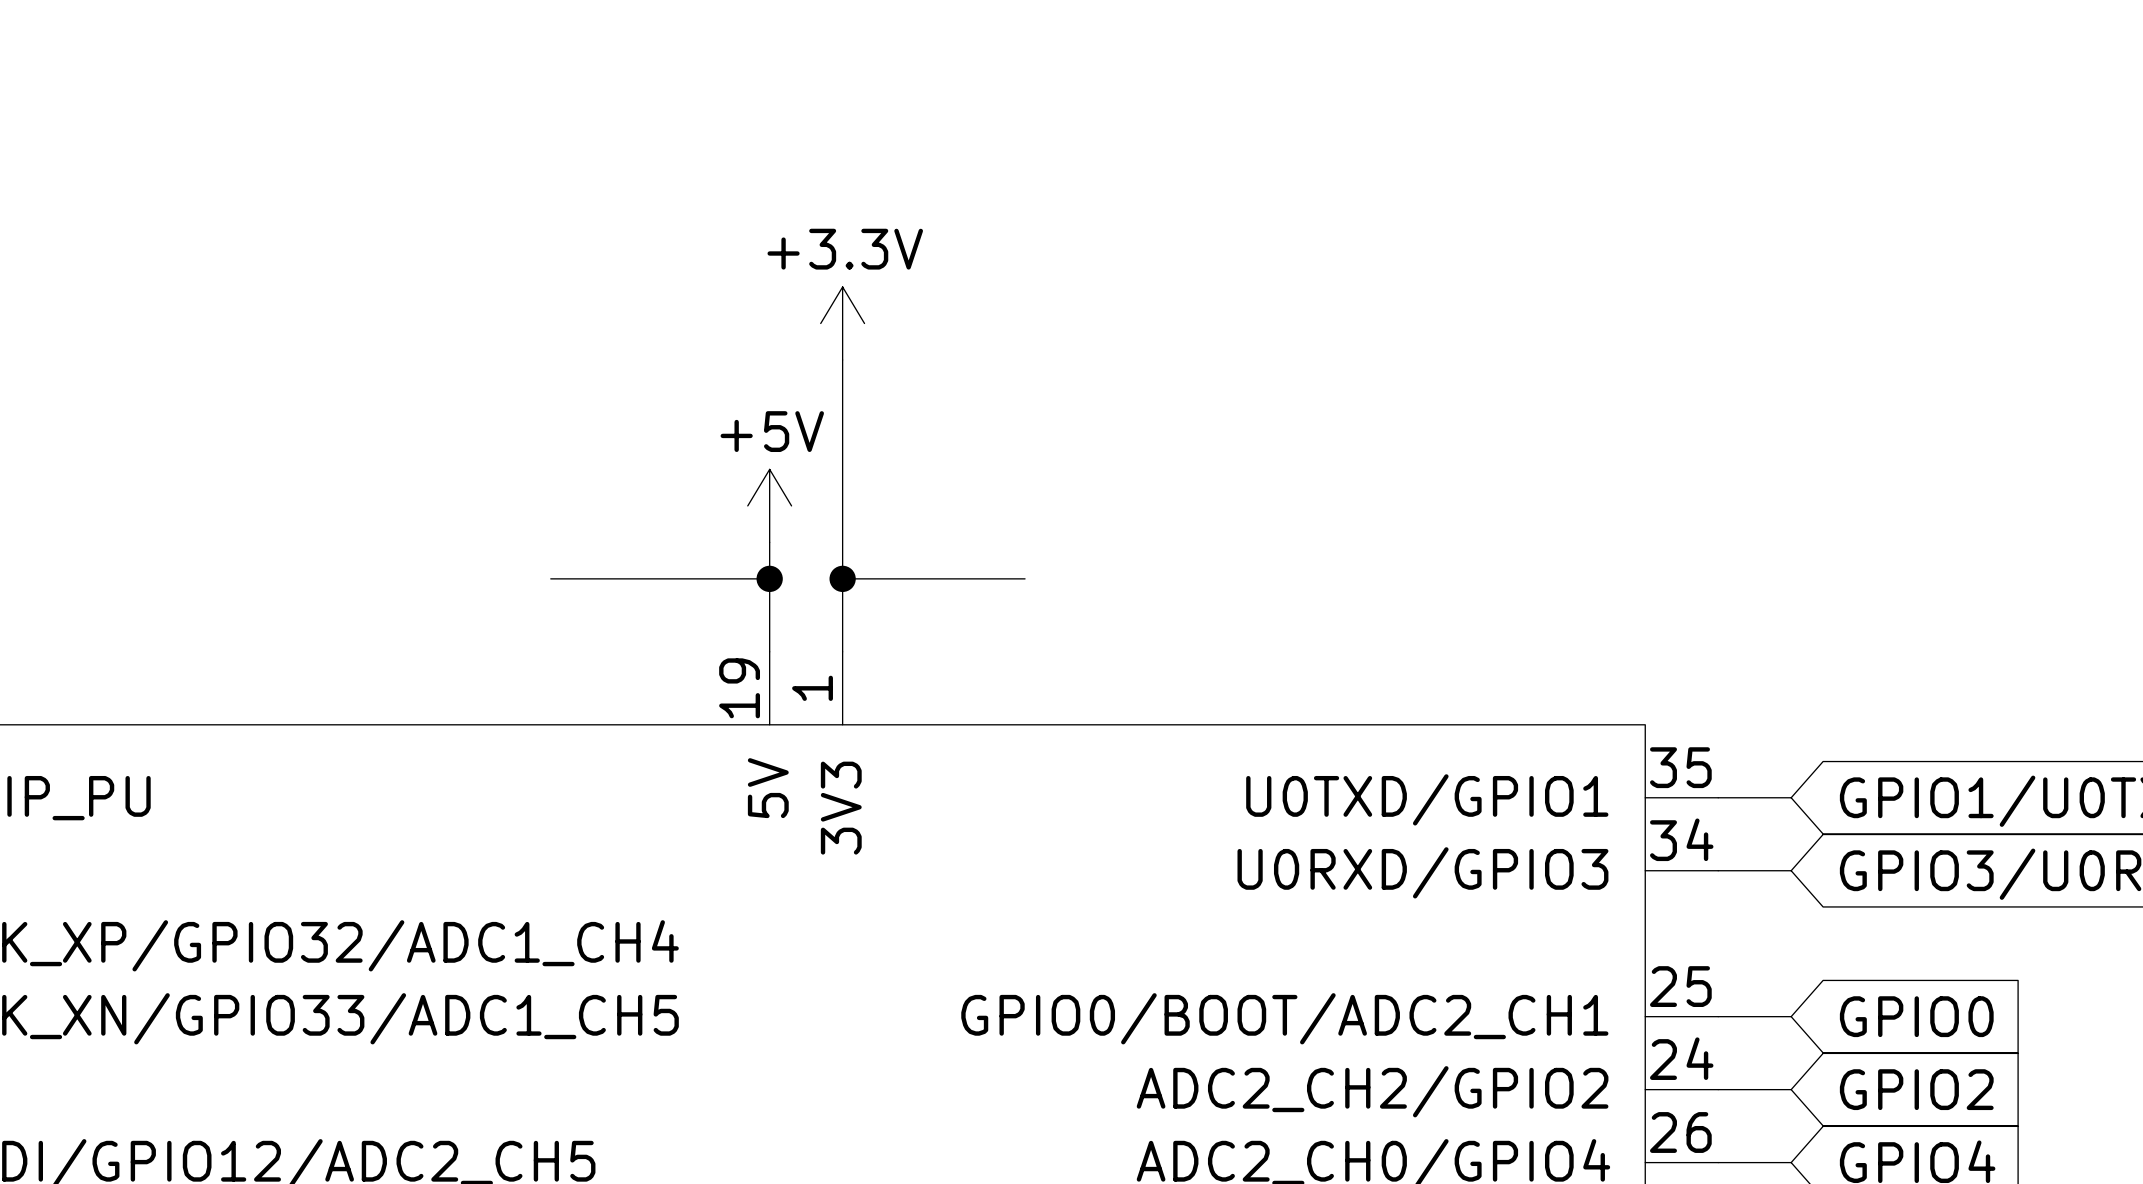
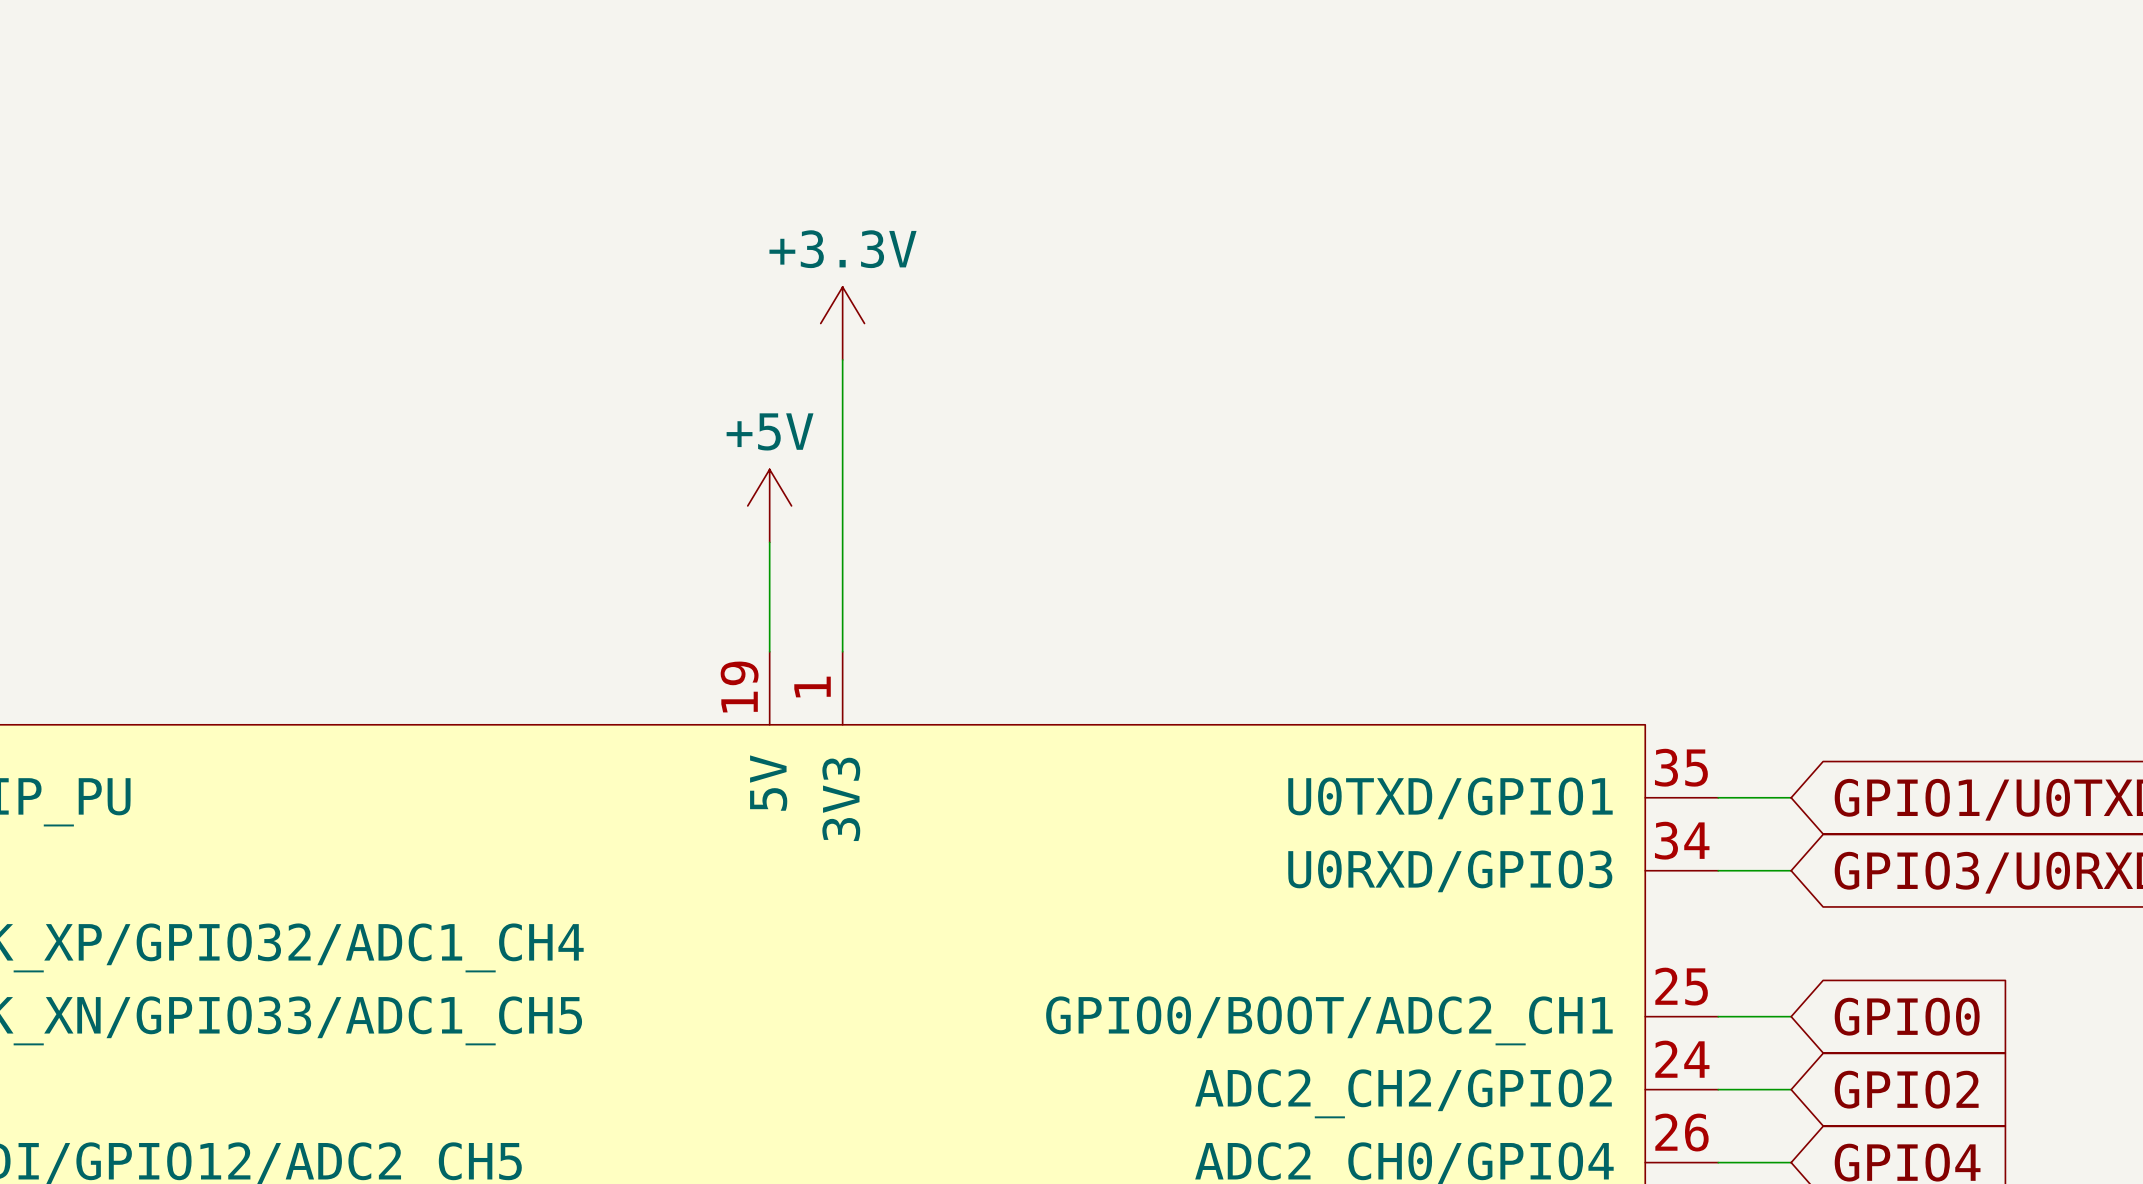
wire: (550, 578) (769, 578) -> none
junction: (769, 578) -> none
wire: (842, 578) (1025, 578) -> none
junction: (842, 578) -> none

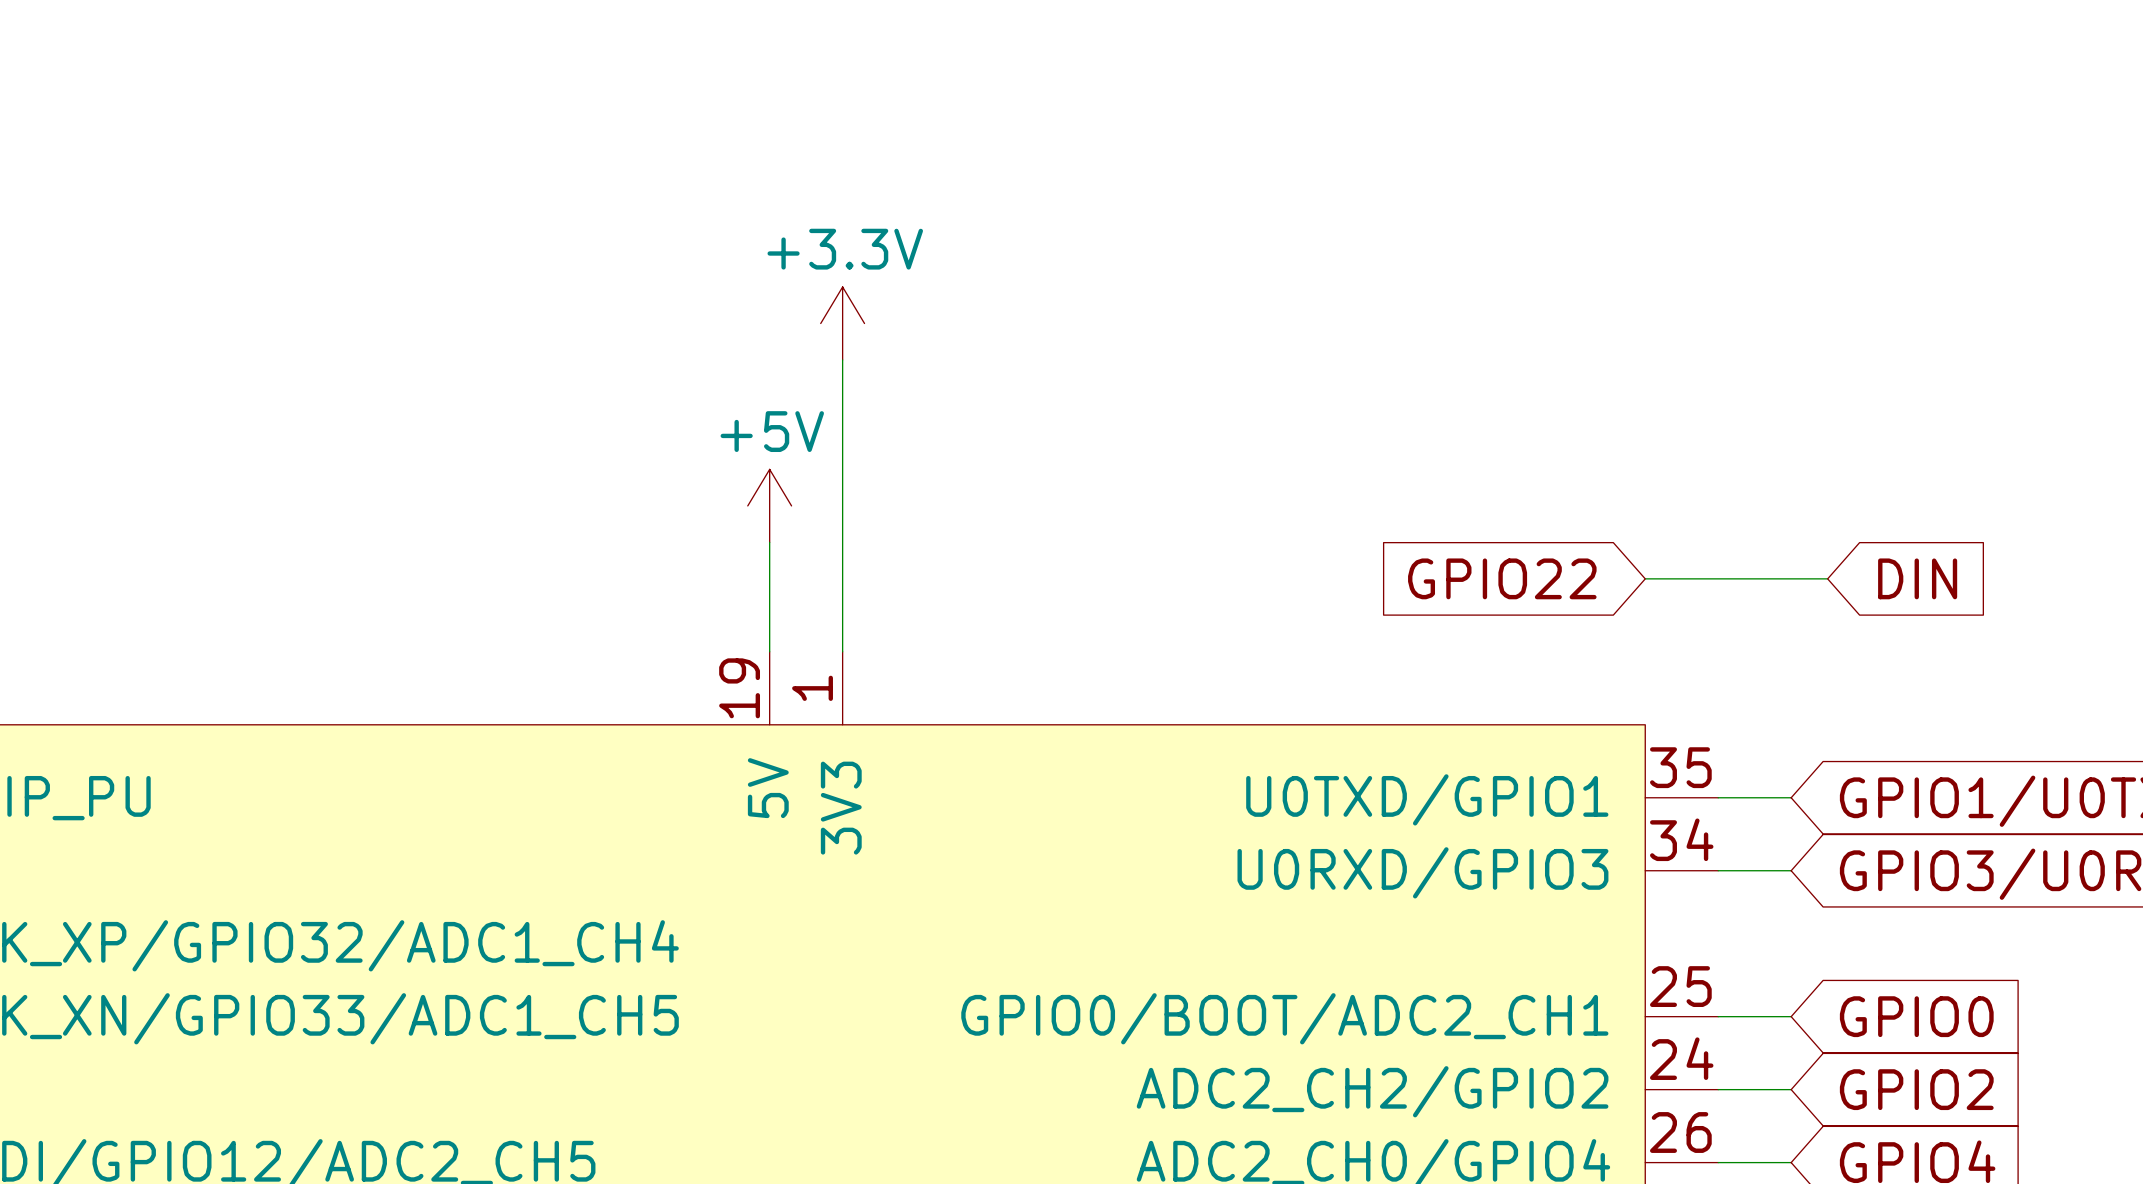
global label: none -> GPIO22 (1502, 578)
wire: none -> (1645, 578) (1827, 578)
global label: none -> DIN (1917, 578)

